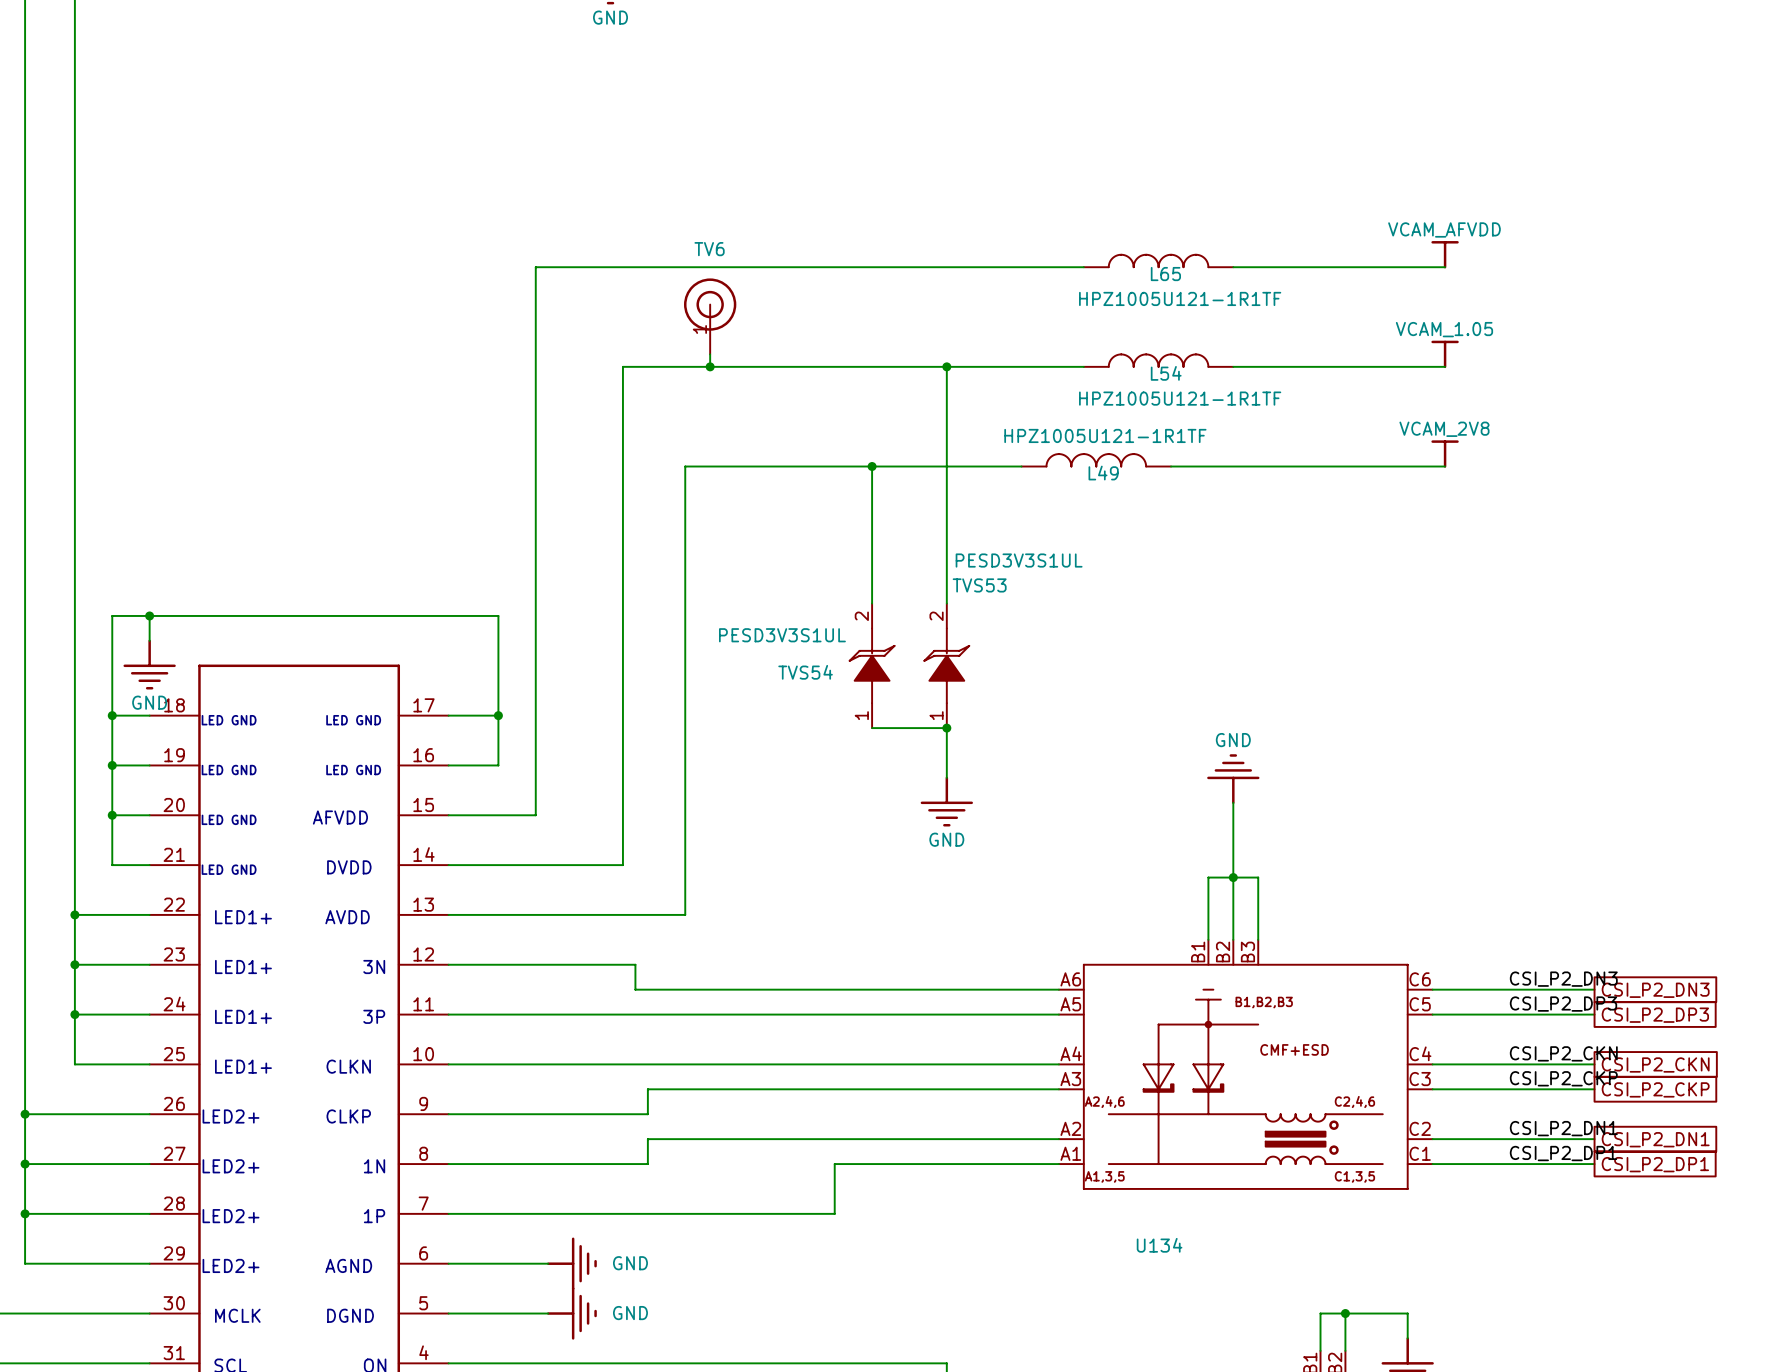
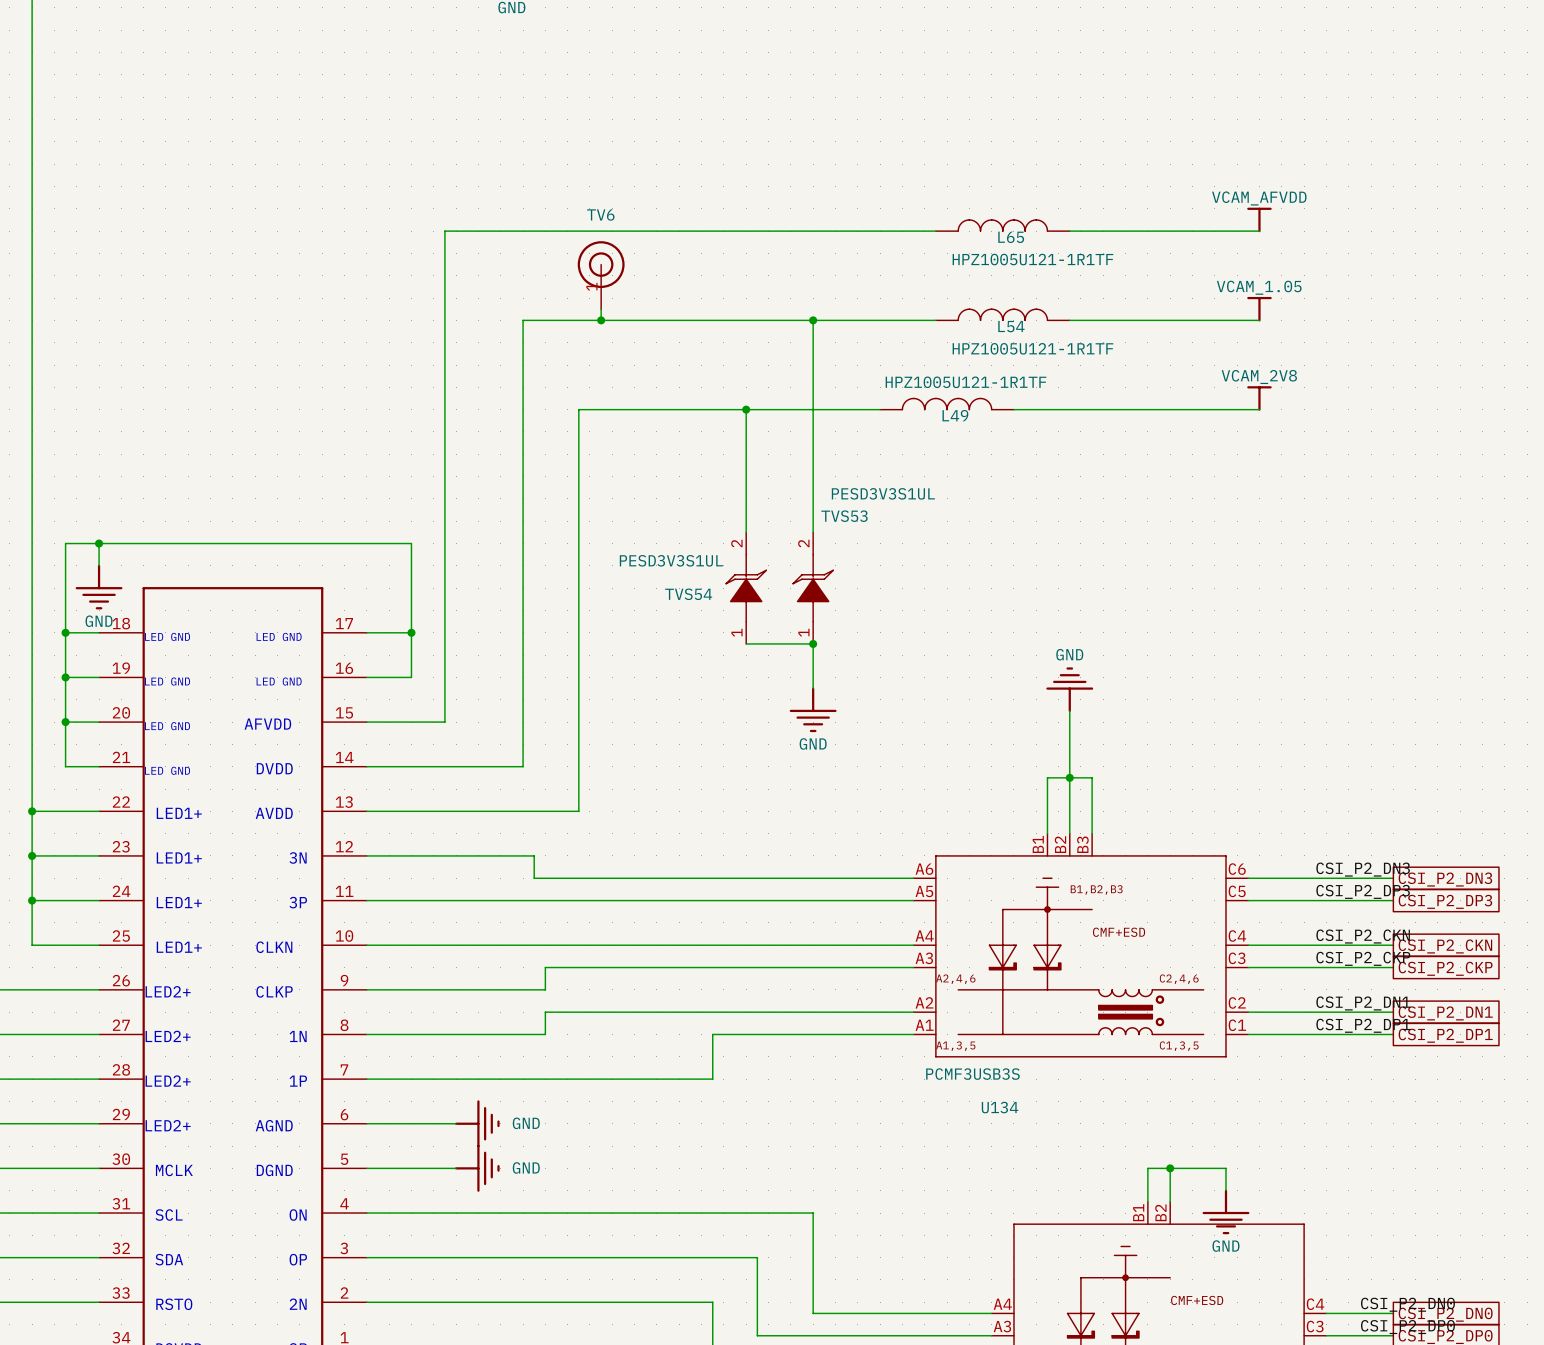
U134 value: none -> PCMF3USB3S (972, 1074)

